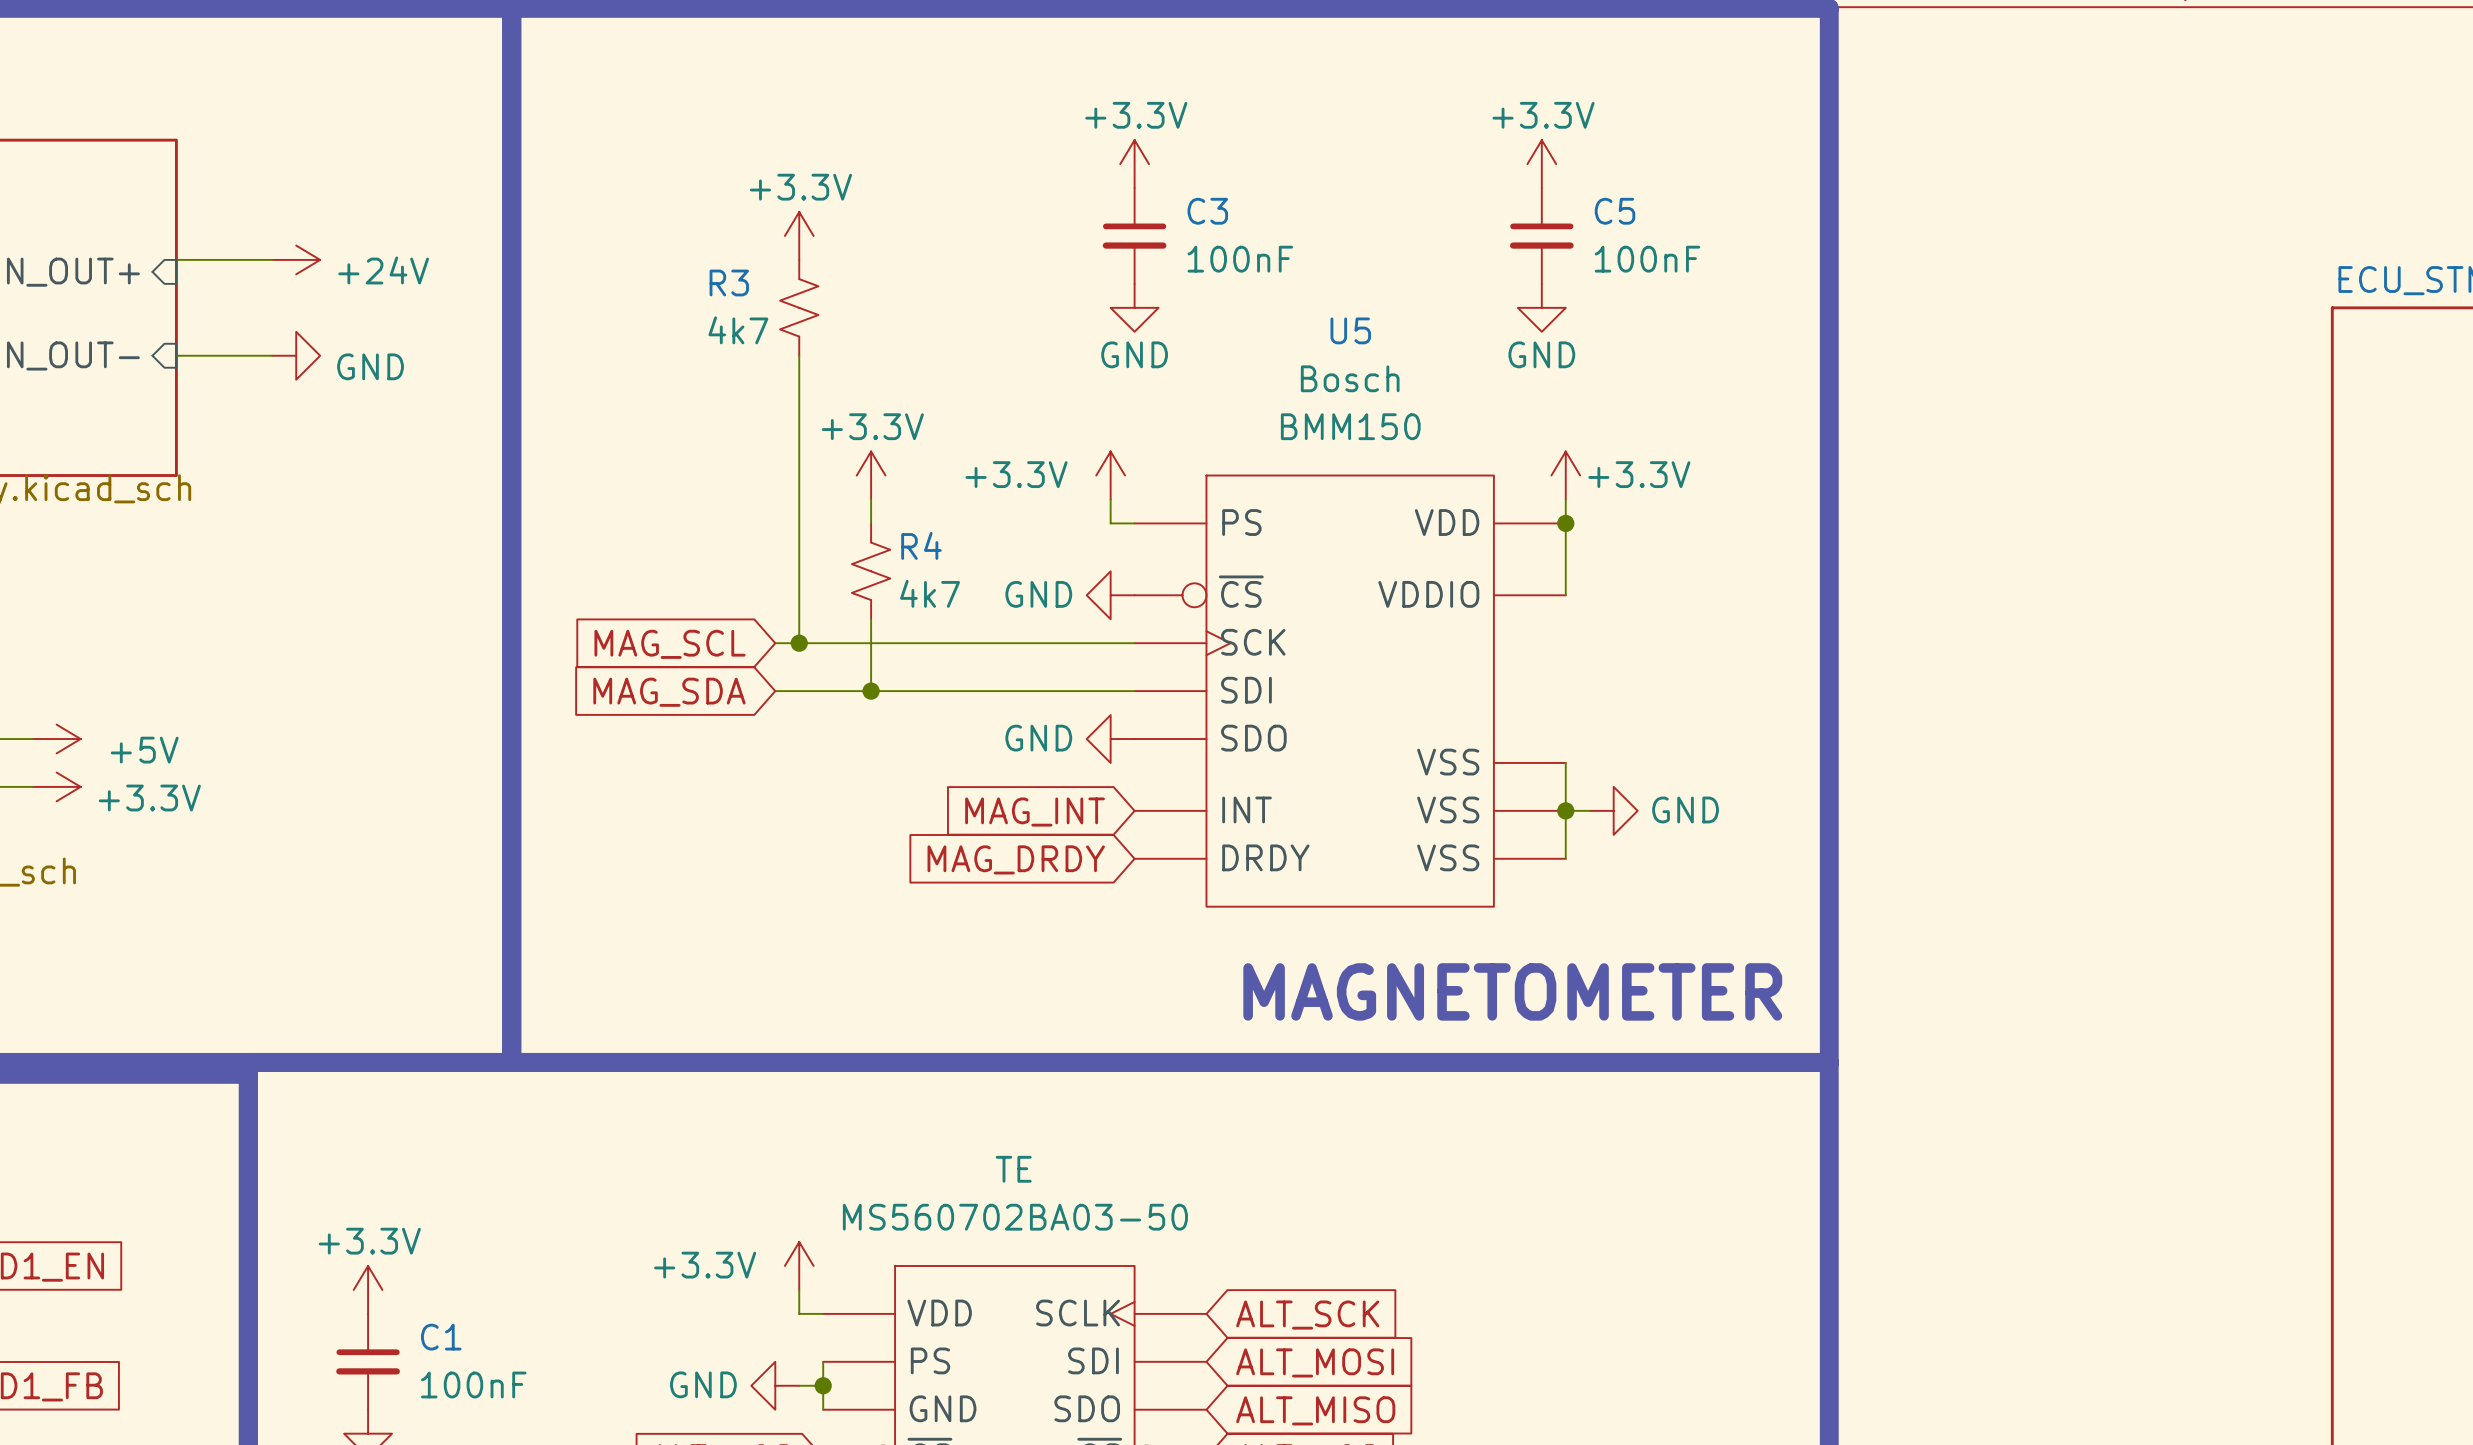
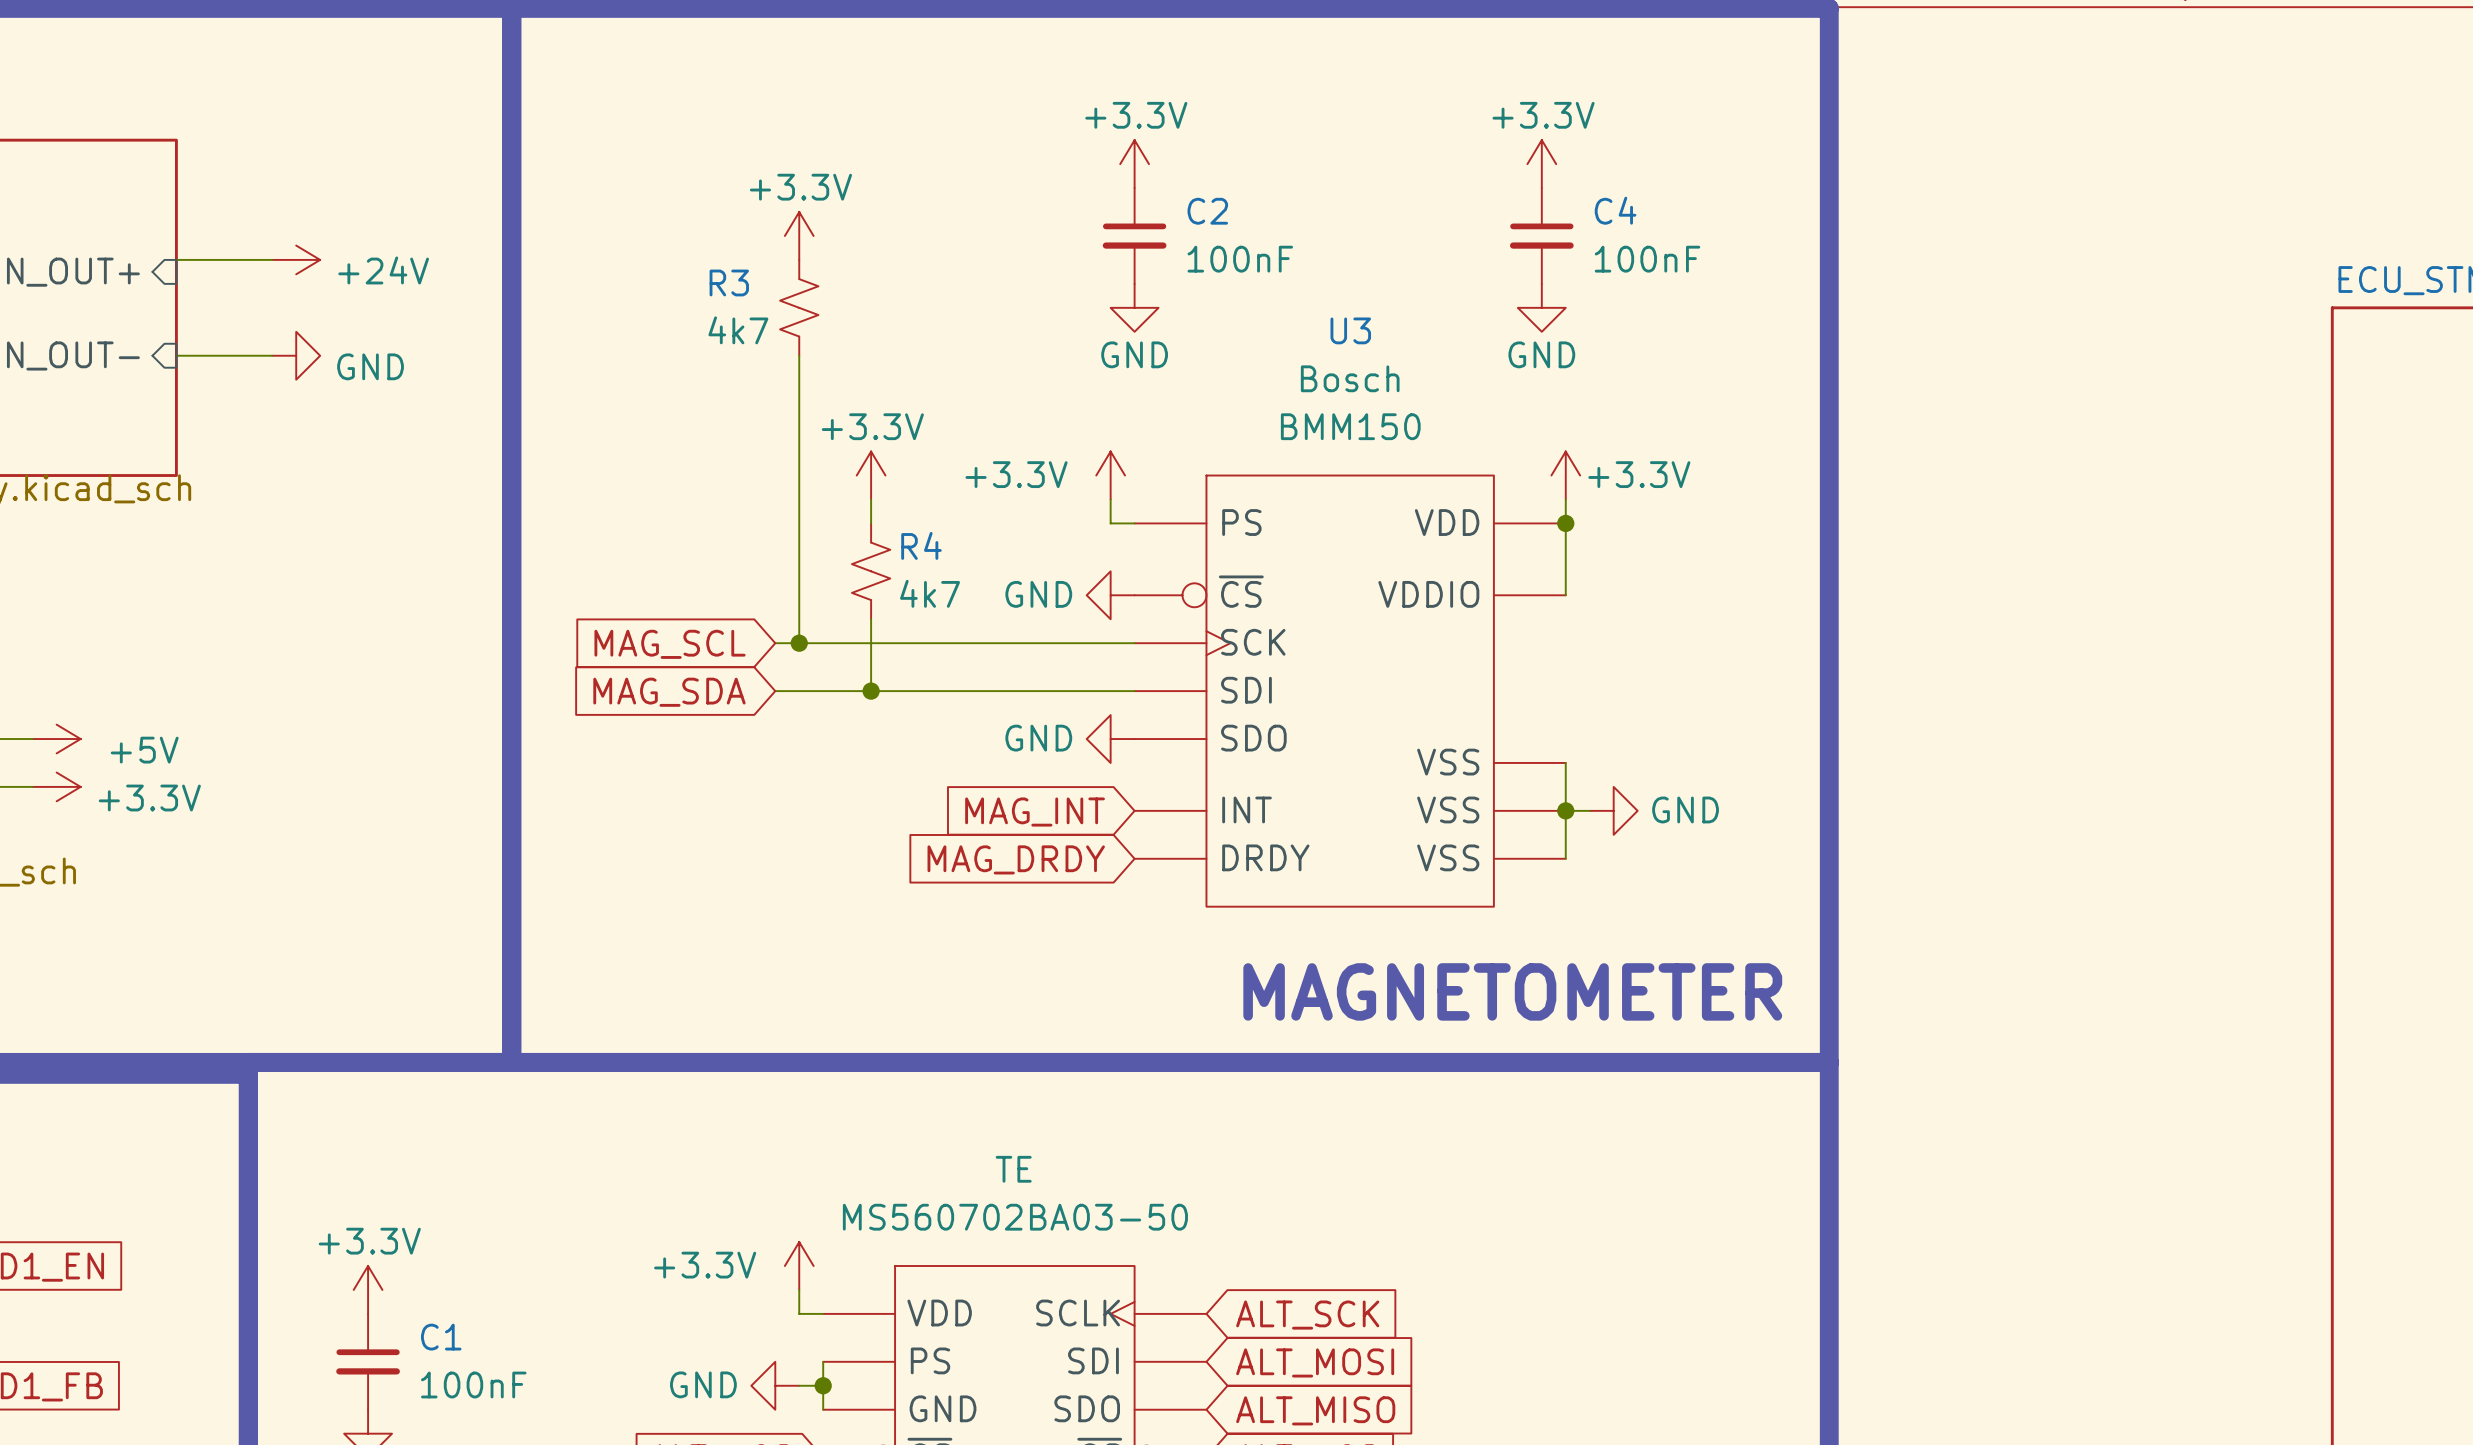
C3 name: C3 (1207, 211) -> C2 (1207, 211)
C5 name: C5 (1615, 211) -> C4 (1615, 210)
U5 name: U5 (1350, 330) -> U3 (1350, 330)

